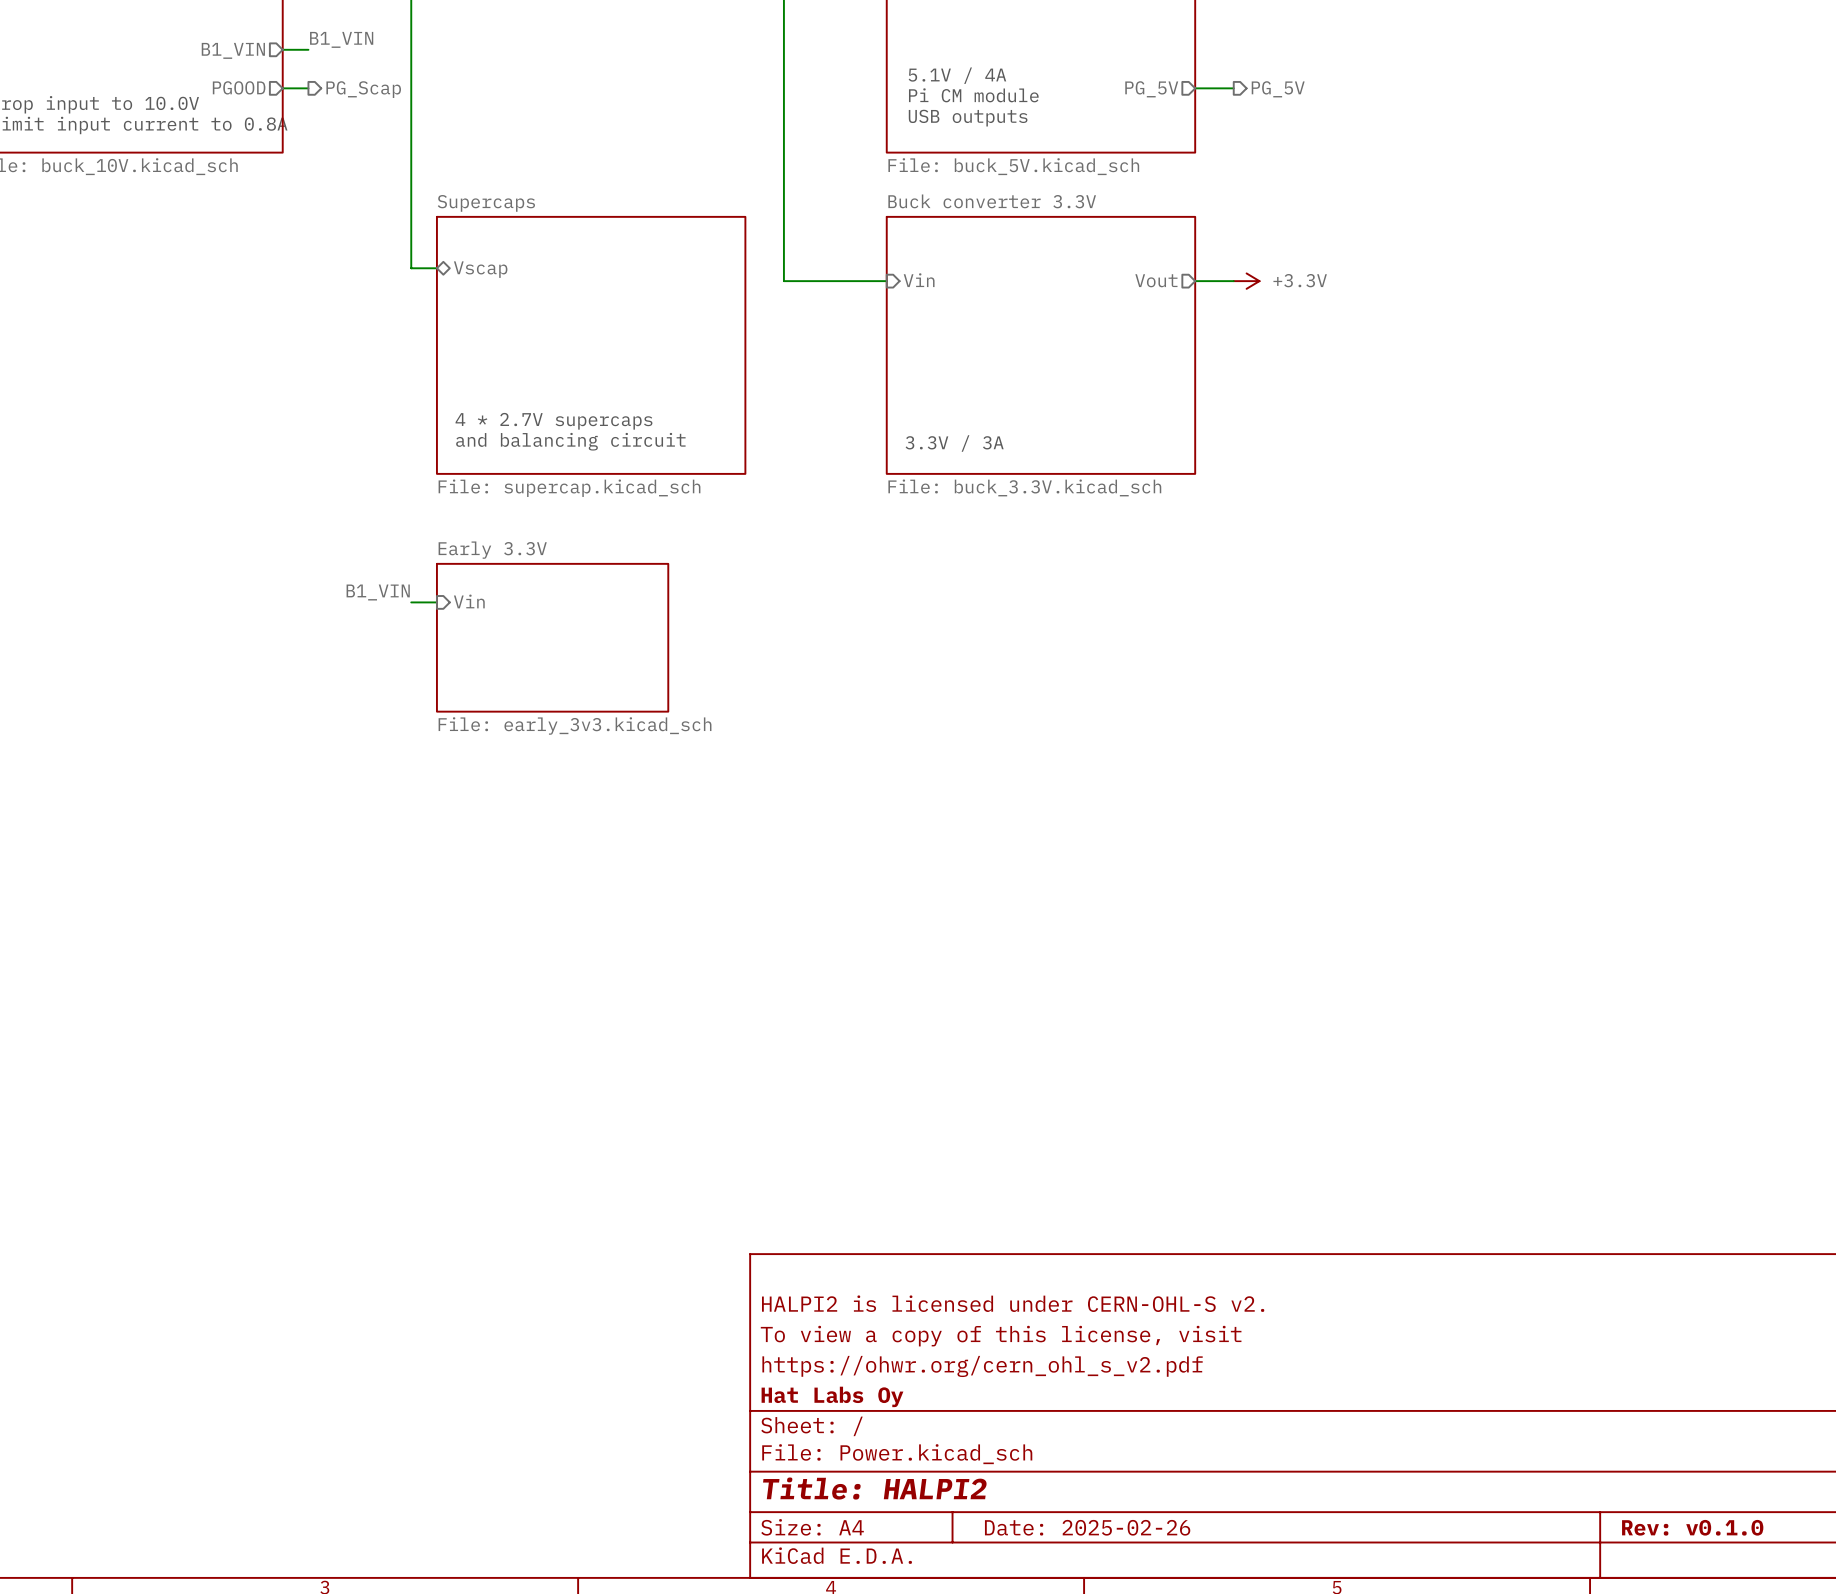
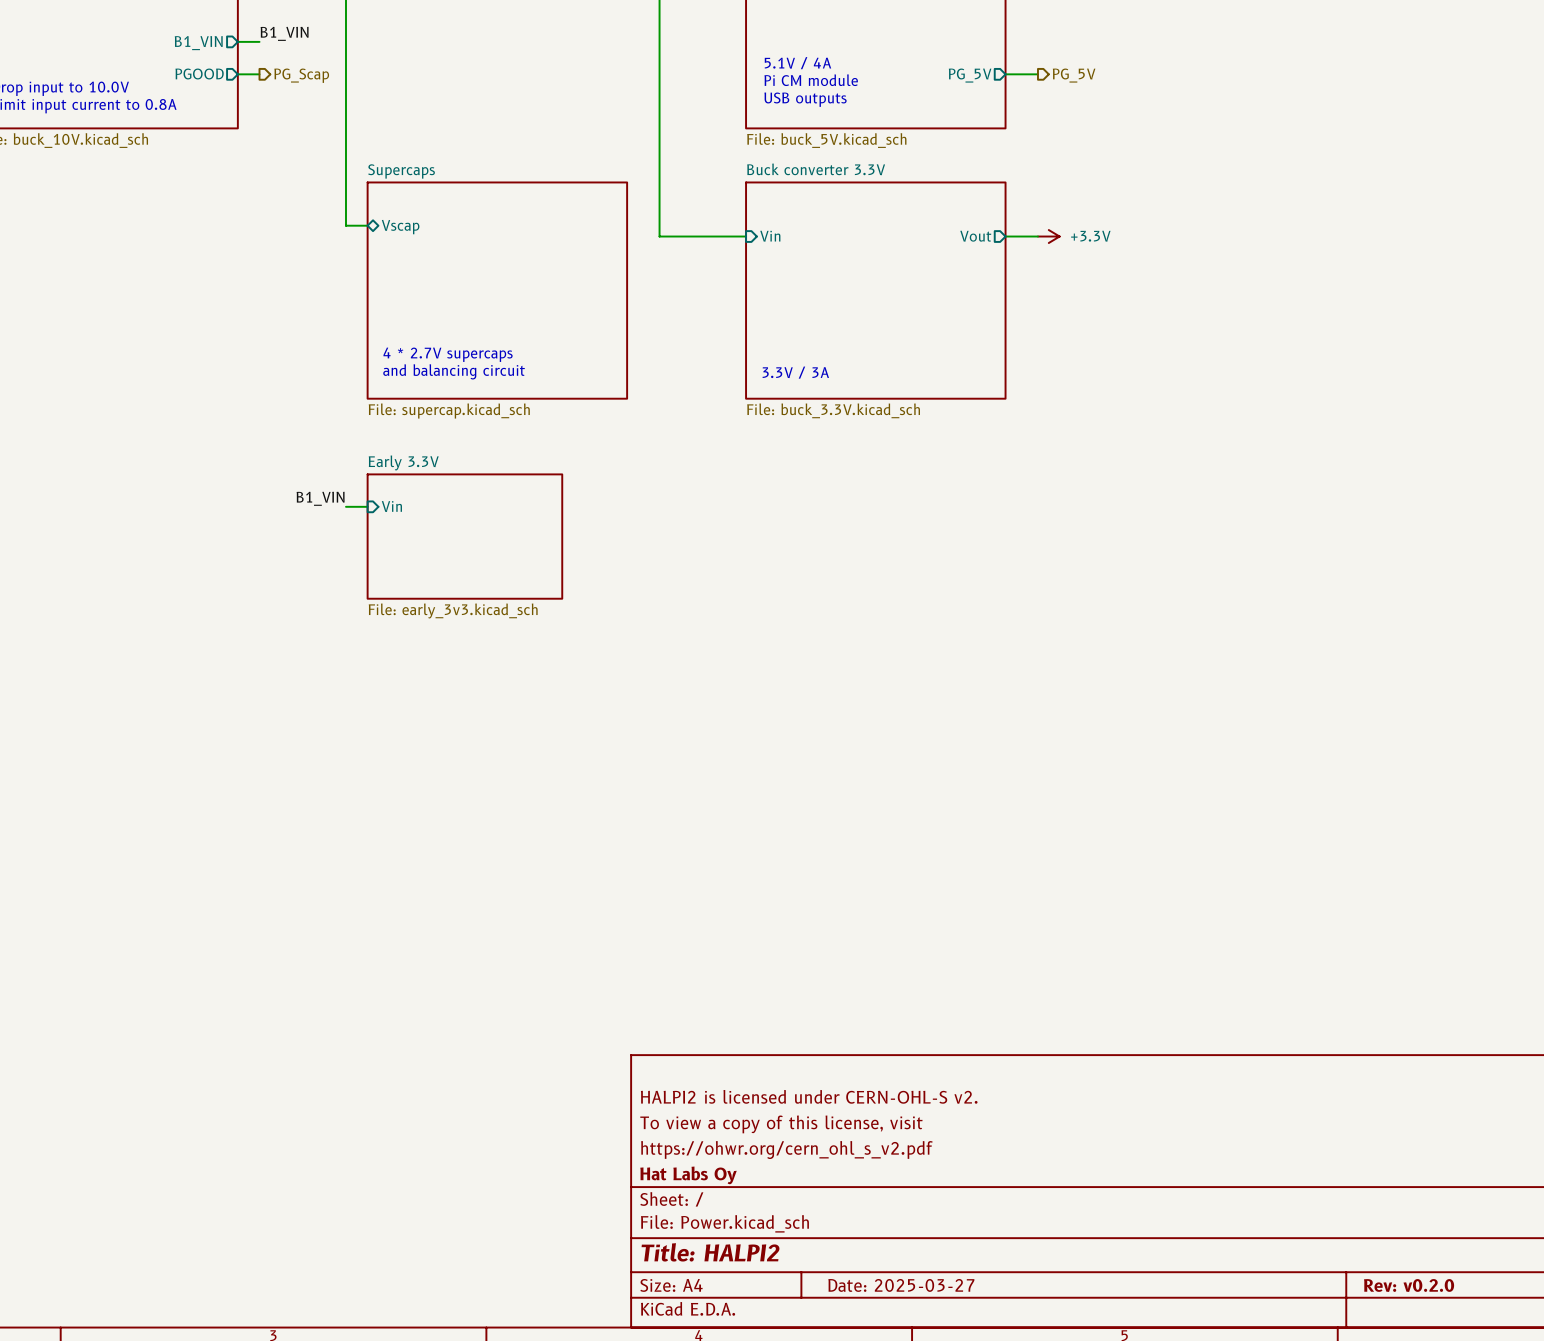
title block: Date: 2025-02-26 (1087, 1527) -> Date: 2025-03-27 (901, 1285)
title block: Rev: v0.1.0 (1692, 1527) -> Rev: v0.2.0 (1409, 1285)

